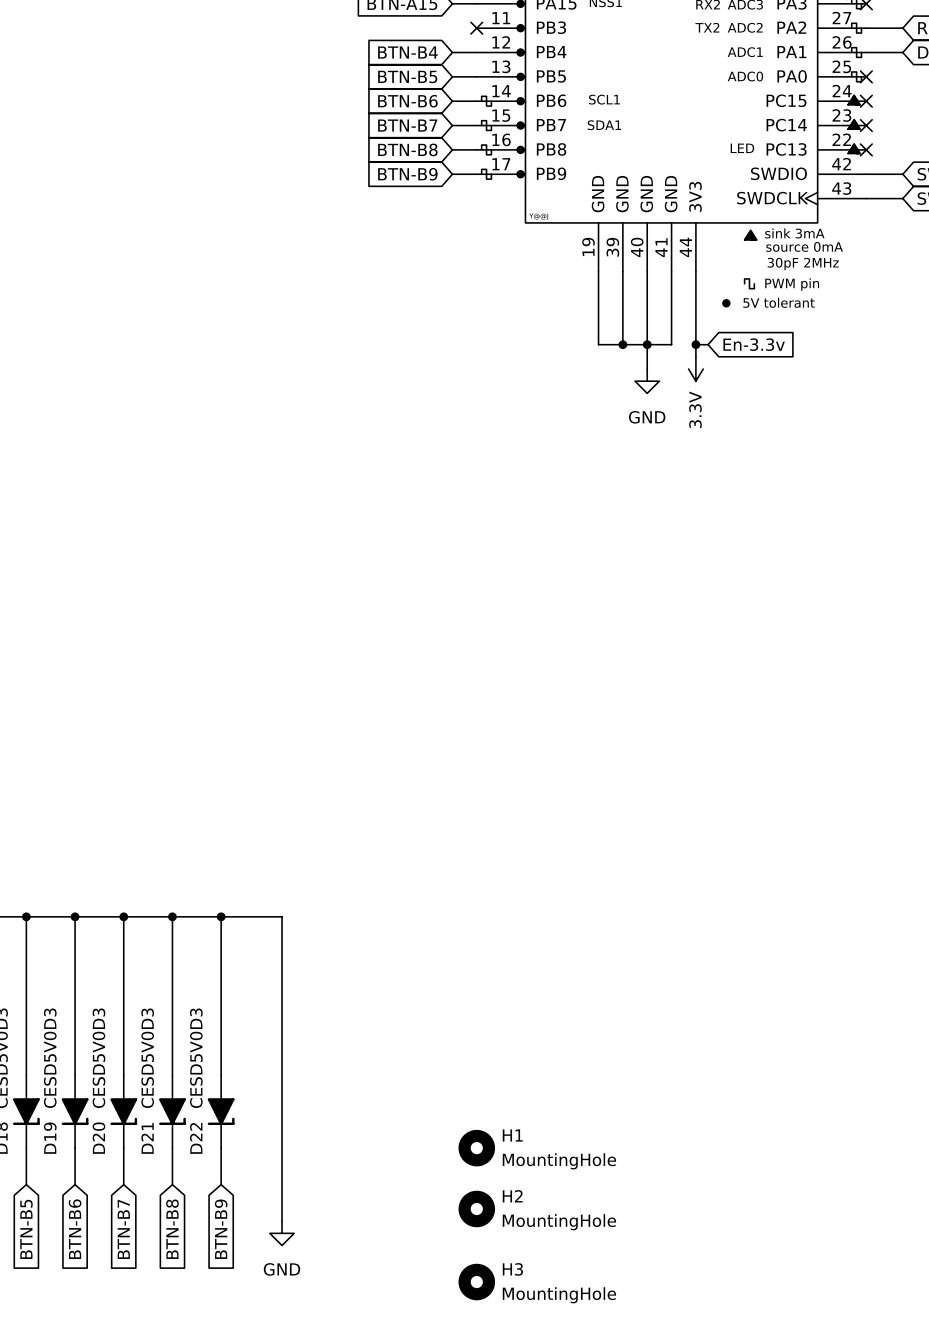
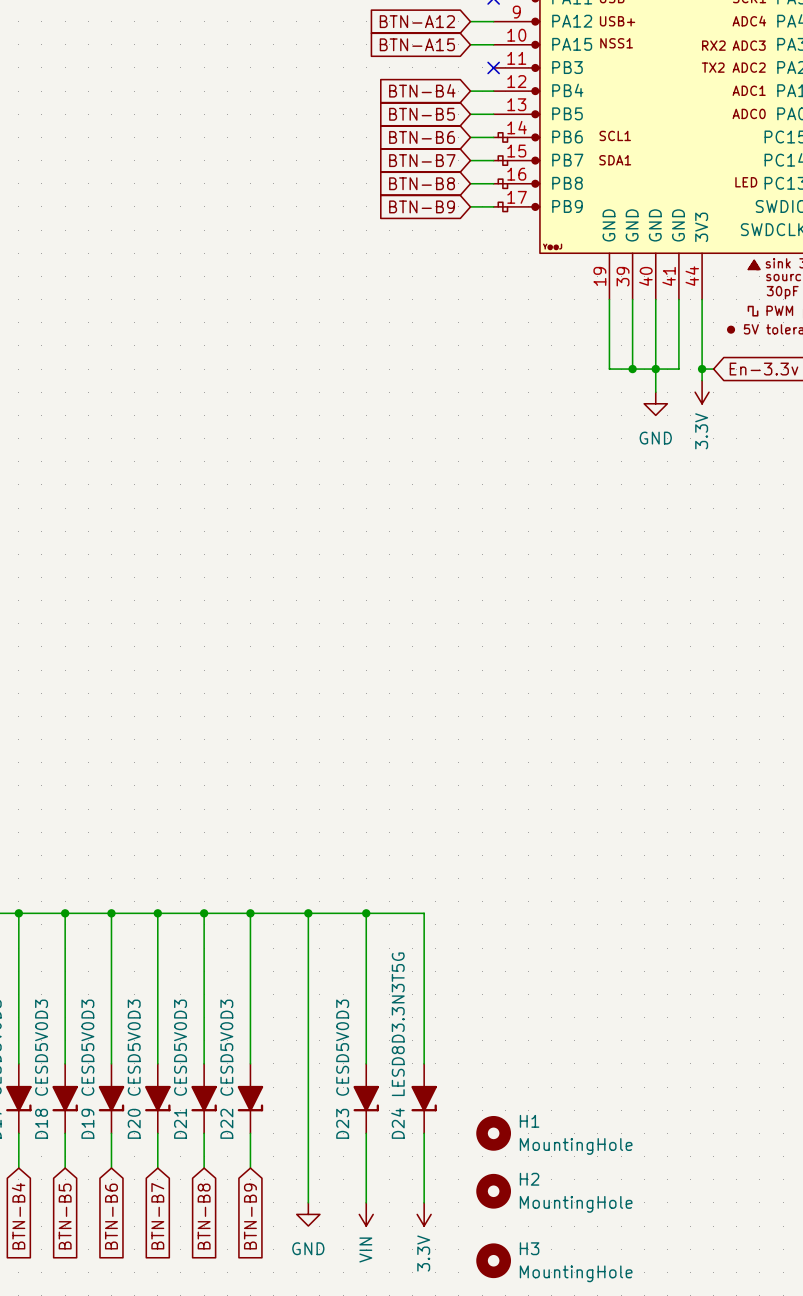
wire: none -> (308, 913) (424, 913) (424, 1063)
junction: none -> (308, 913)
wire: none -> (366, 913) (366, 1063)
junction: none -> (366, 913)
D23: none -> CESD5V0D3 (366, 1098)
D24: none -> LESD8D3.3N3T5G (424, 1098)
wire: none -> (366, 1133) (366, 1202)
wire: none -> (424, 1133) (424, 1202)
power symbol: none -> VIN (366, 1214)
power symbol: none -> 3.3V (424, 1214)

